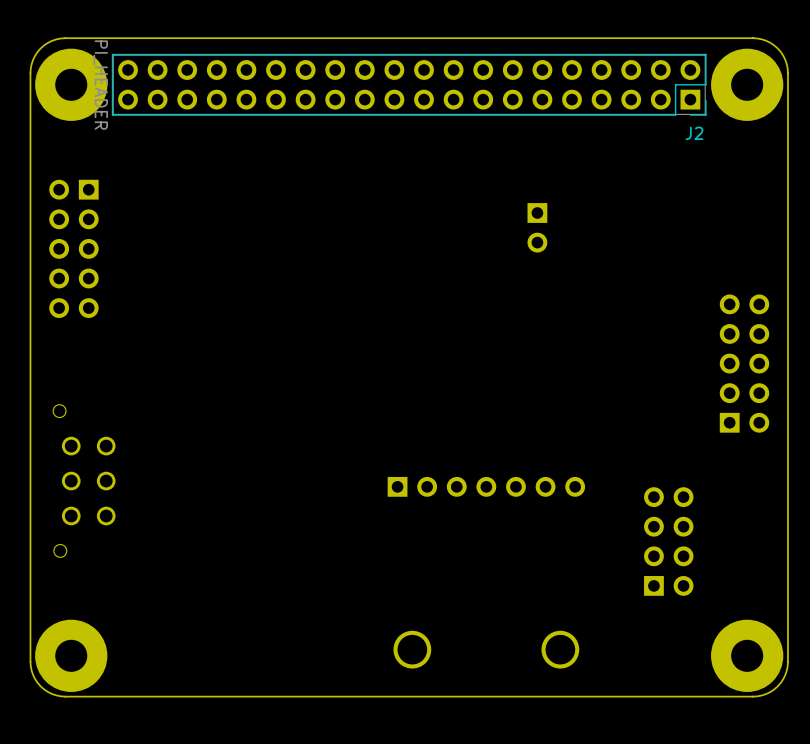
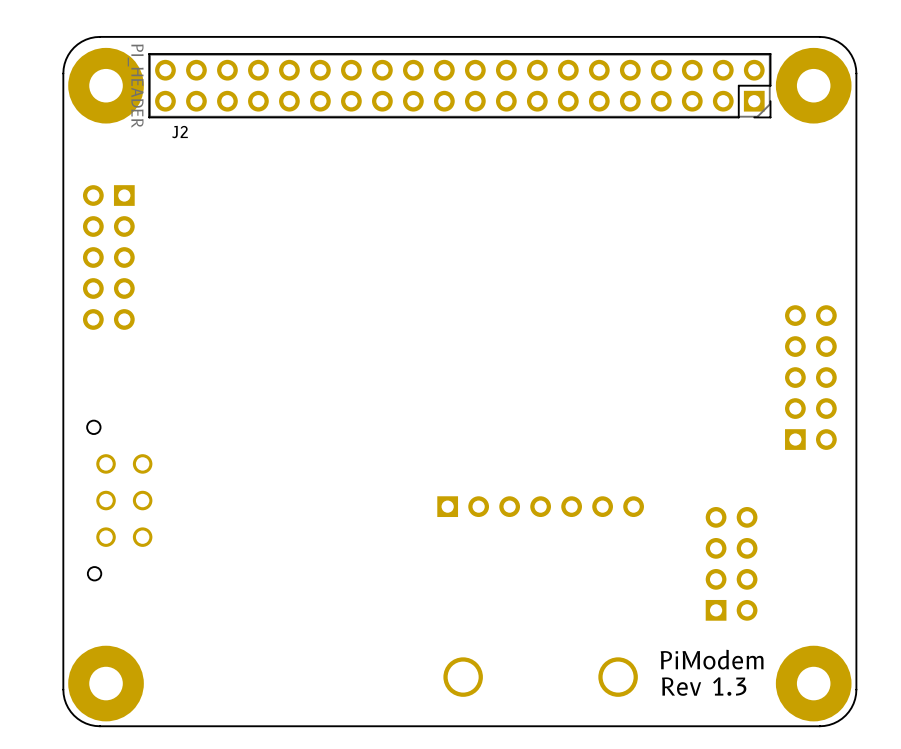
J2 footprint: [111, 53, 707, 116] -> [148, 53, 772, 119]
J2 name position: J2 (694, 133) -> J2 (179, 132)
part: (537, 227) -> none
text: none -> PiModem (712, 659)
text: none -> Rev 1.3 (704, 686)

